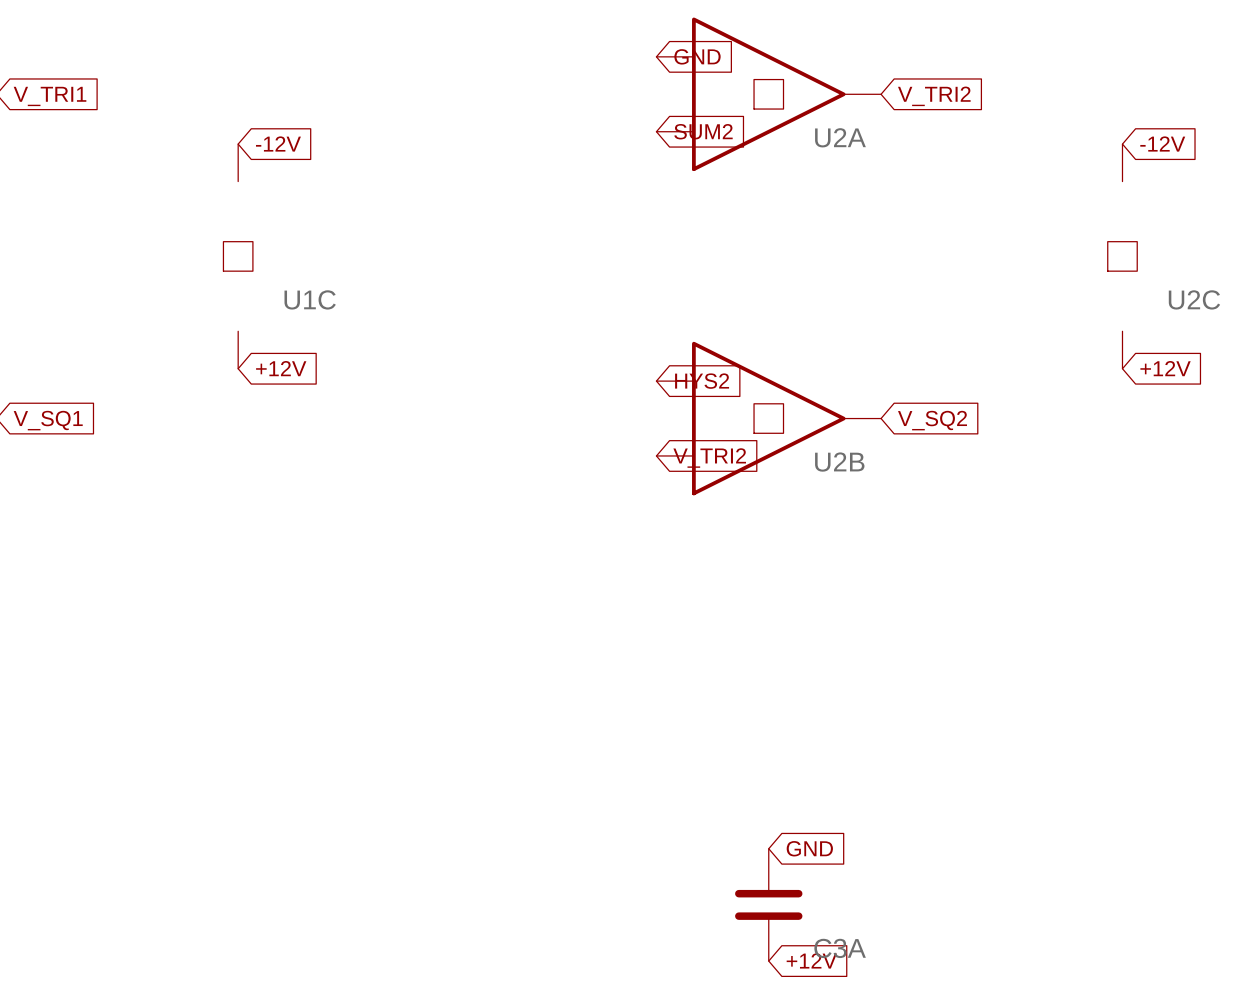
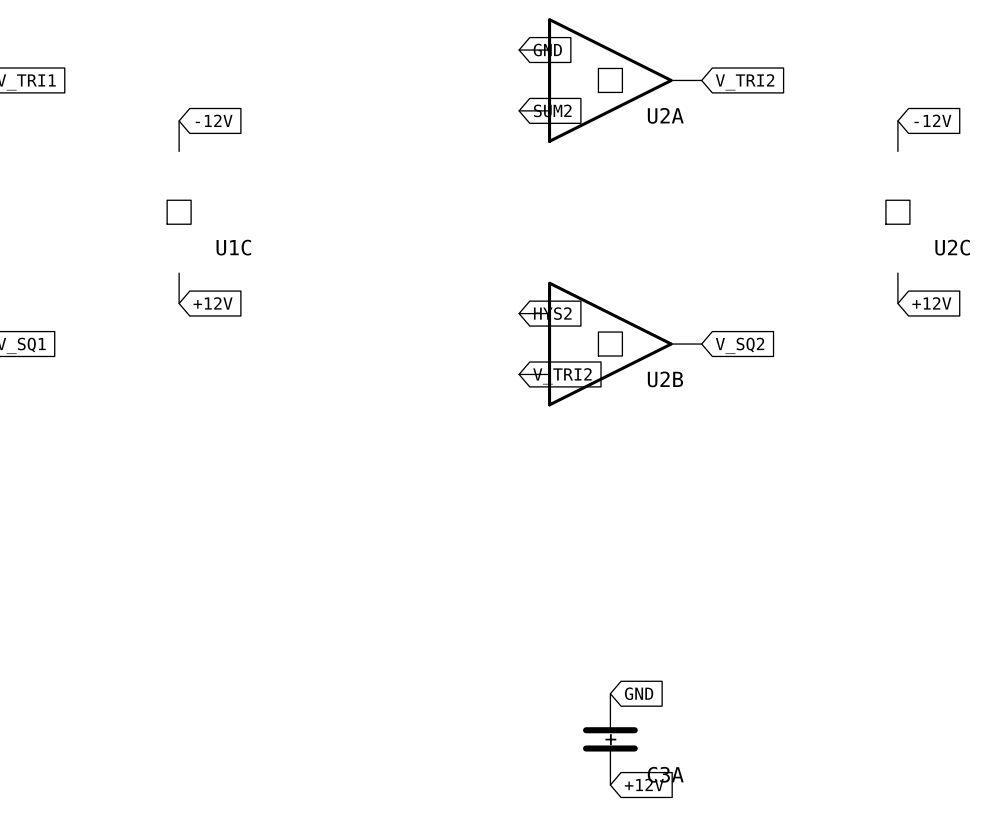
C3A pin name: none -> + (610, 739)

